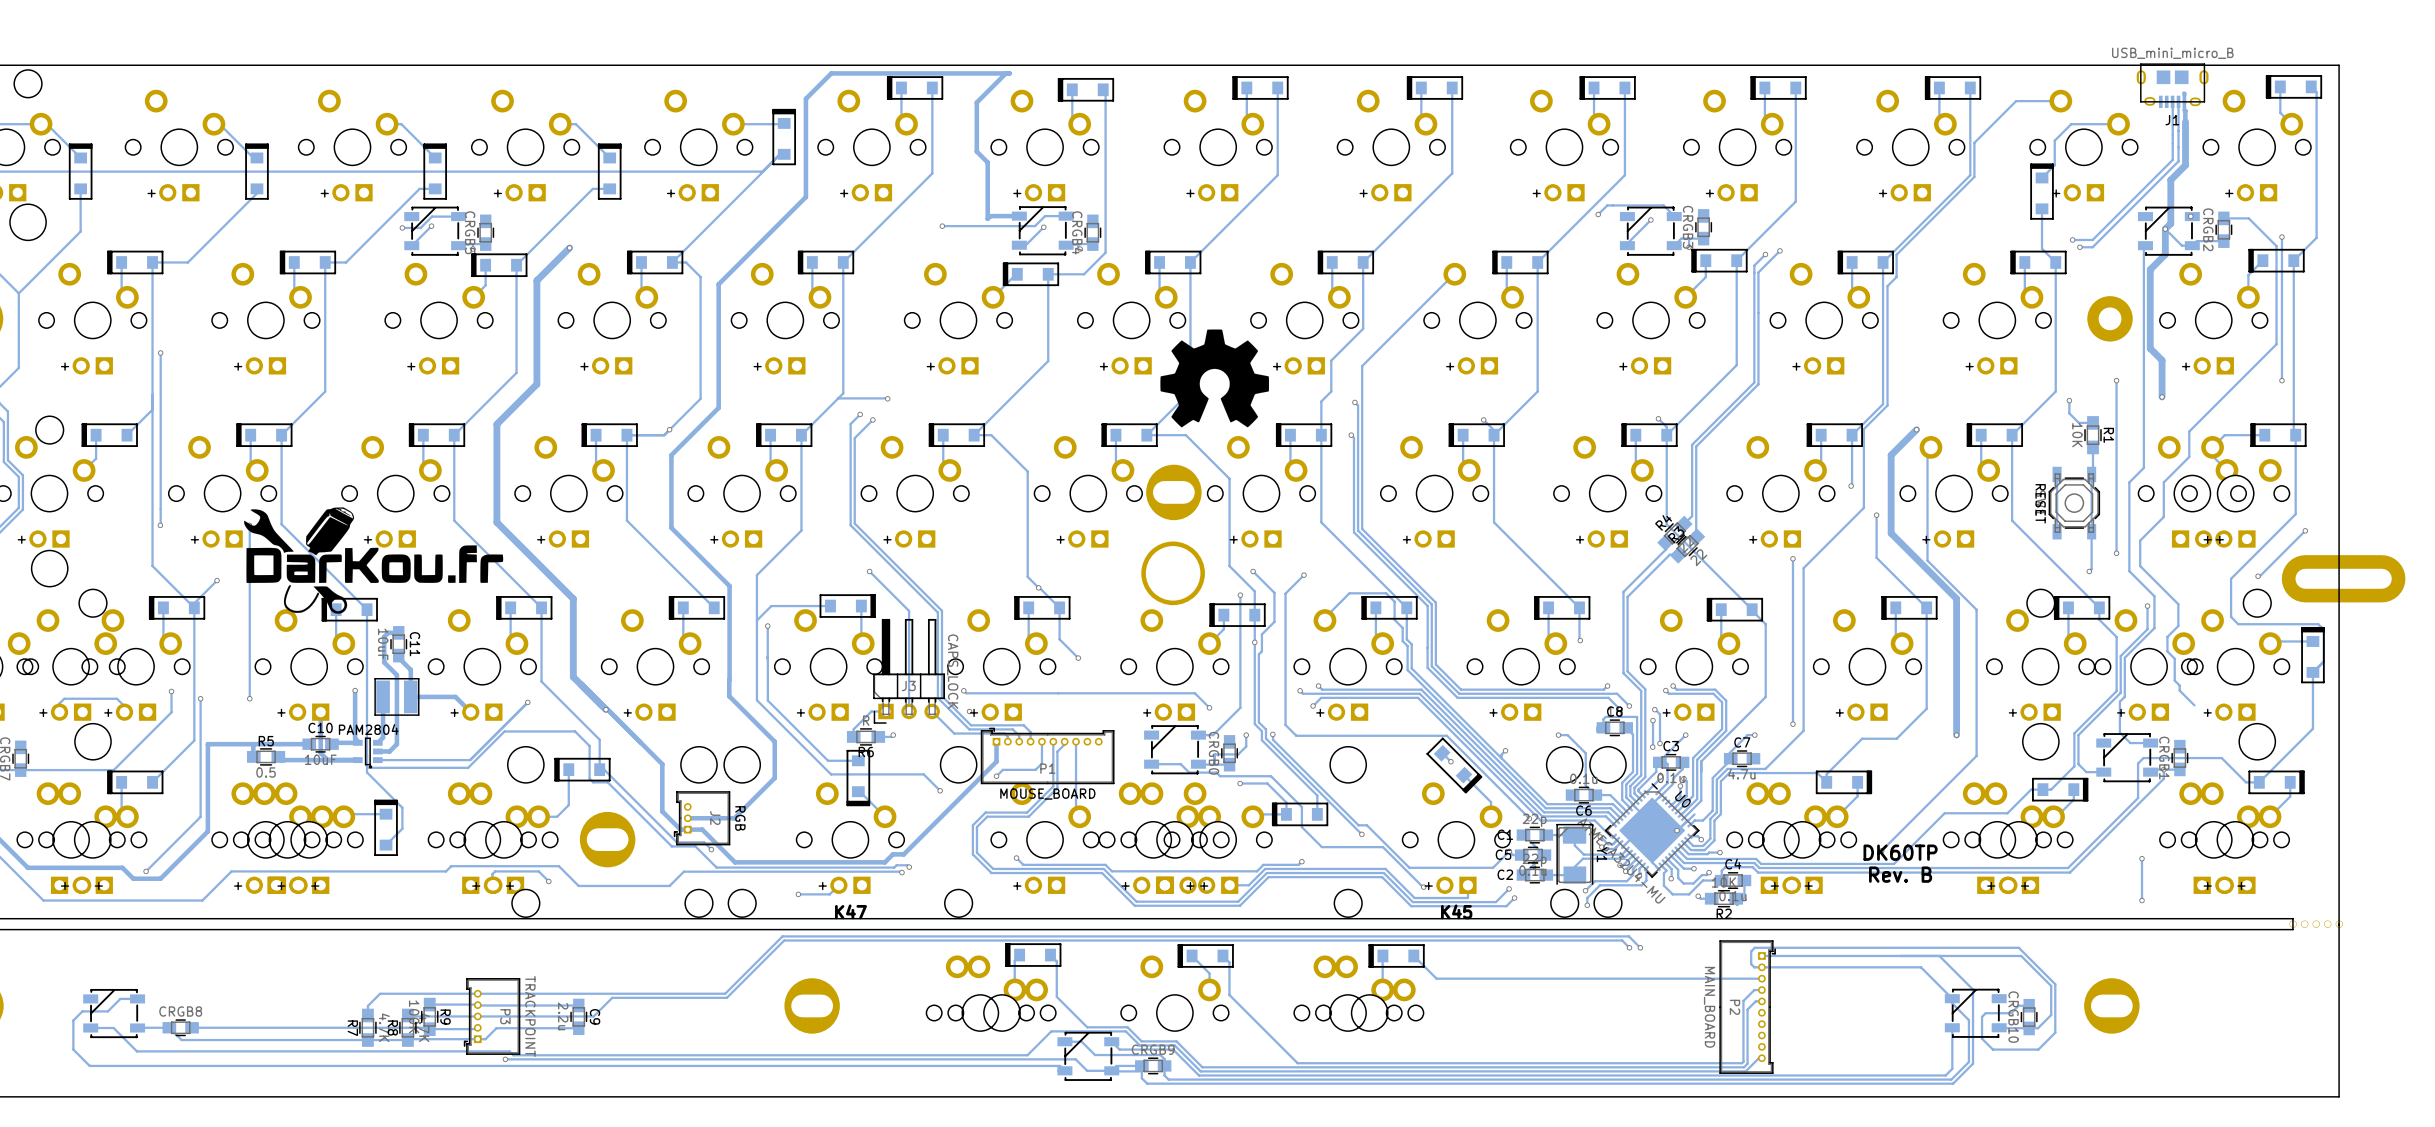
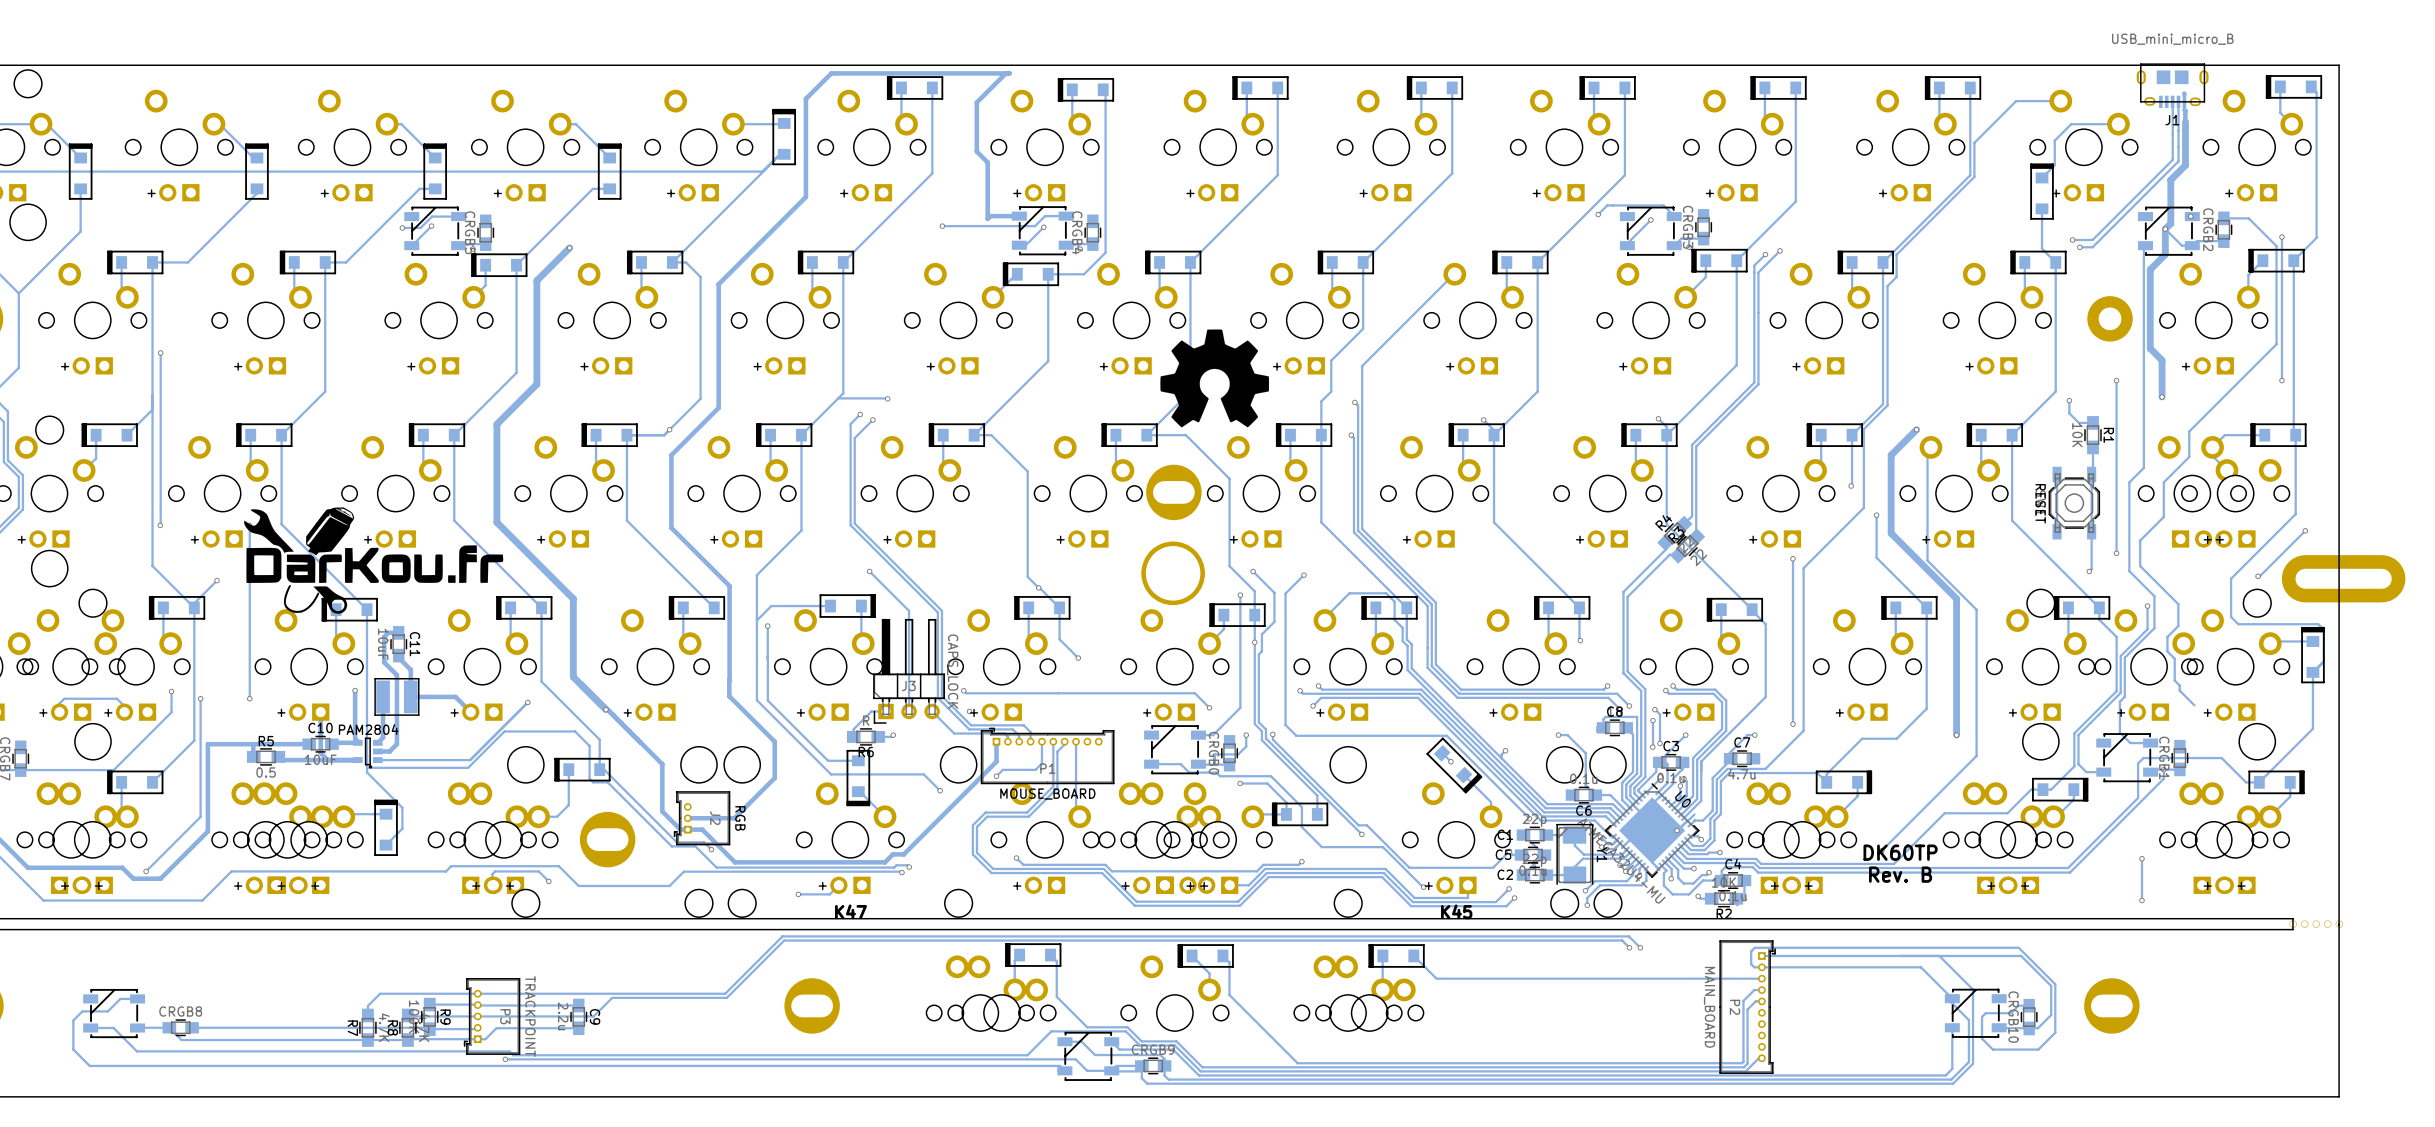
J1 value position: USB_mini_micro_B (2172, 53) -> USB_mini_micro_B (2172, 39)

